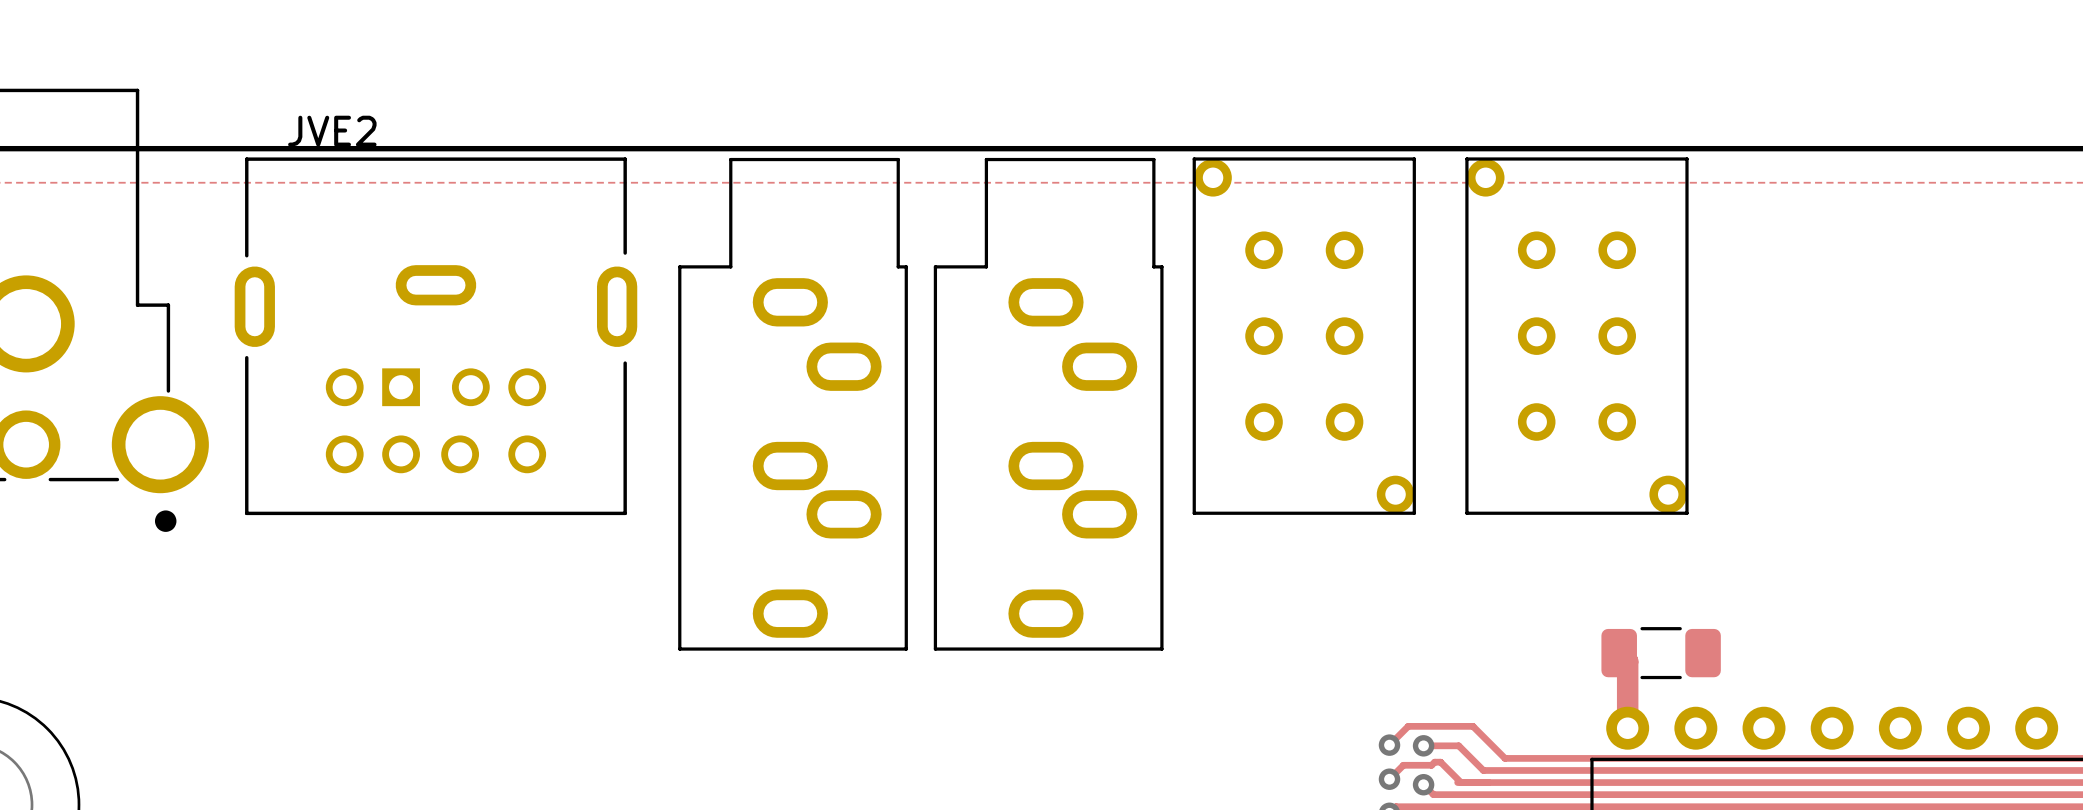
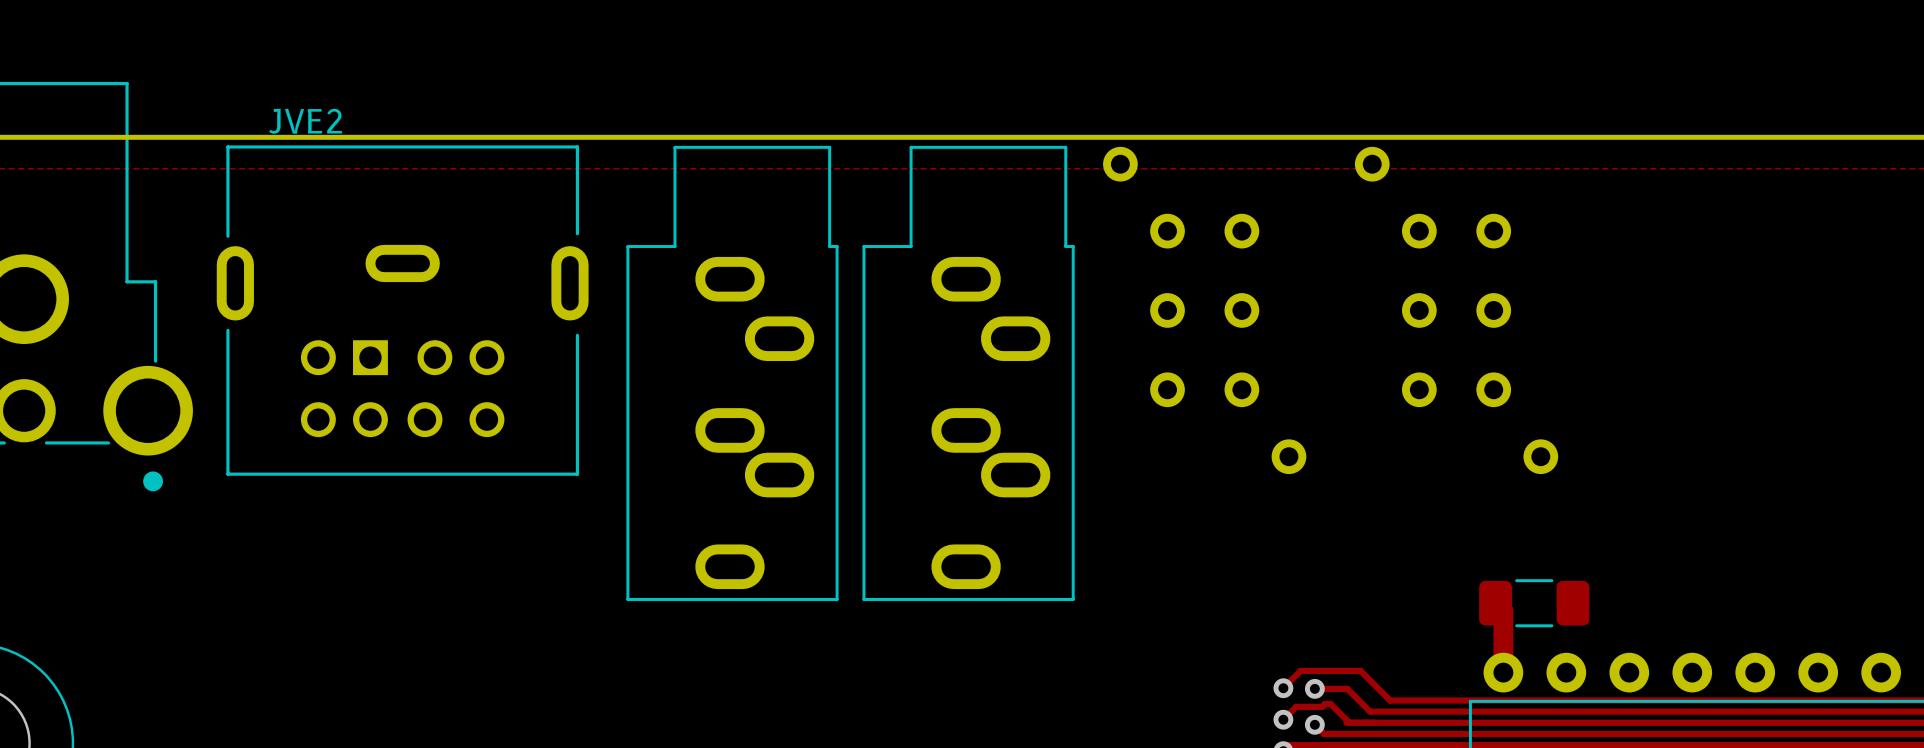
part footprint: [1192, 157, 1416, 515] -> [1103, 146, 1307, 475]
part footprint: [1465, 157, 1689, 515] -> [1354, 146, 1559, 475]

